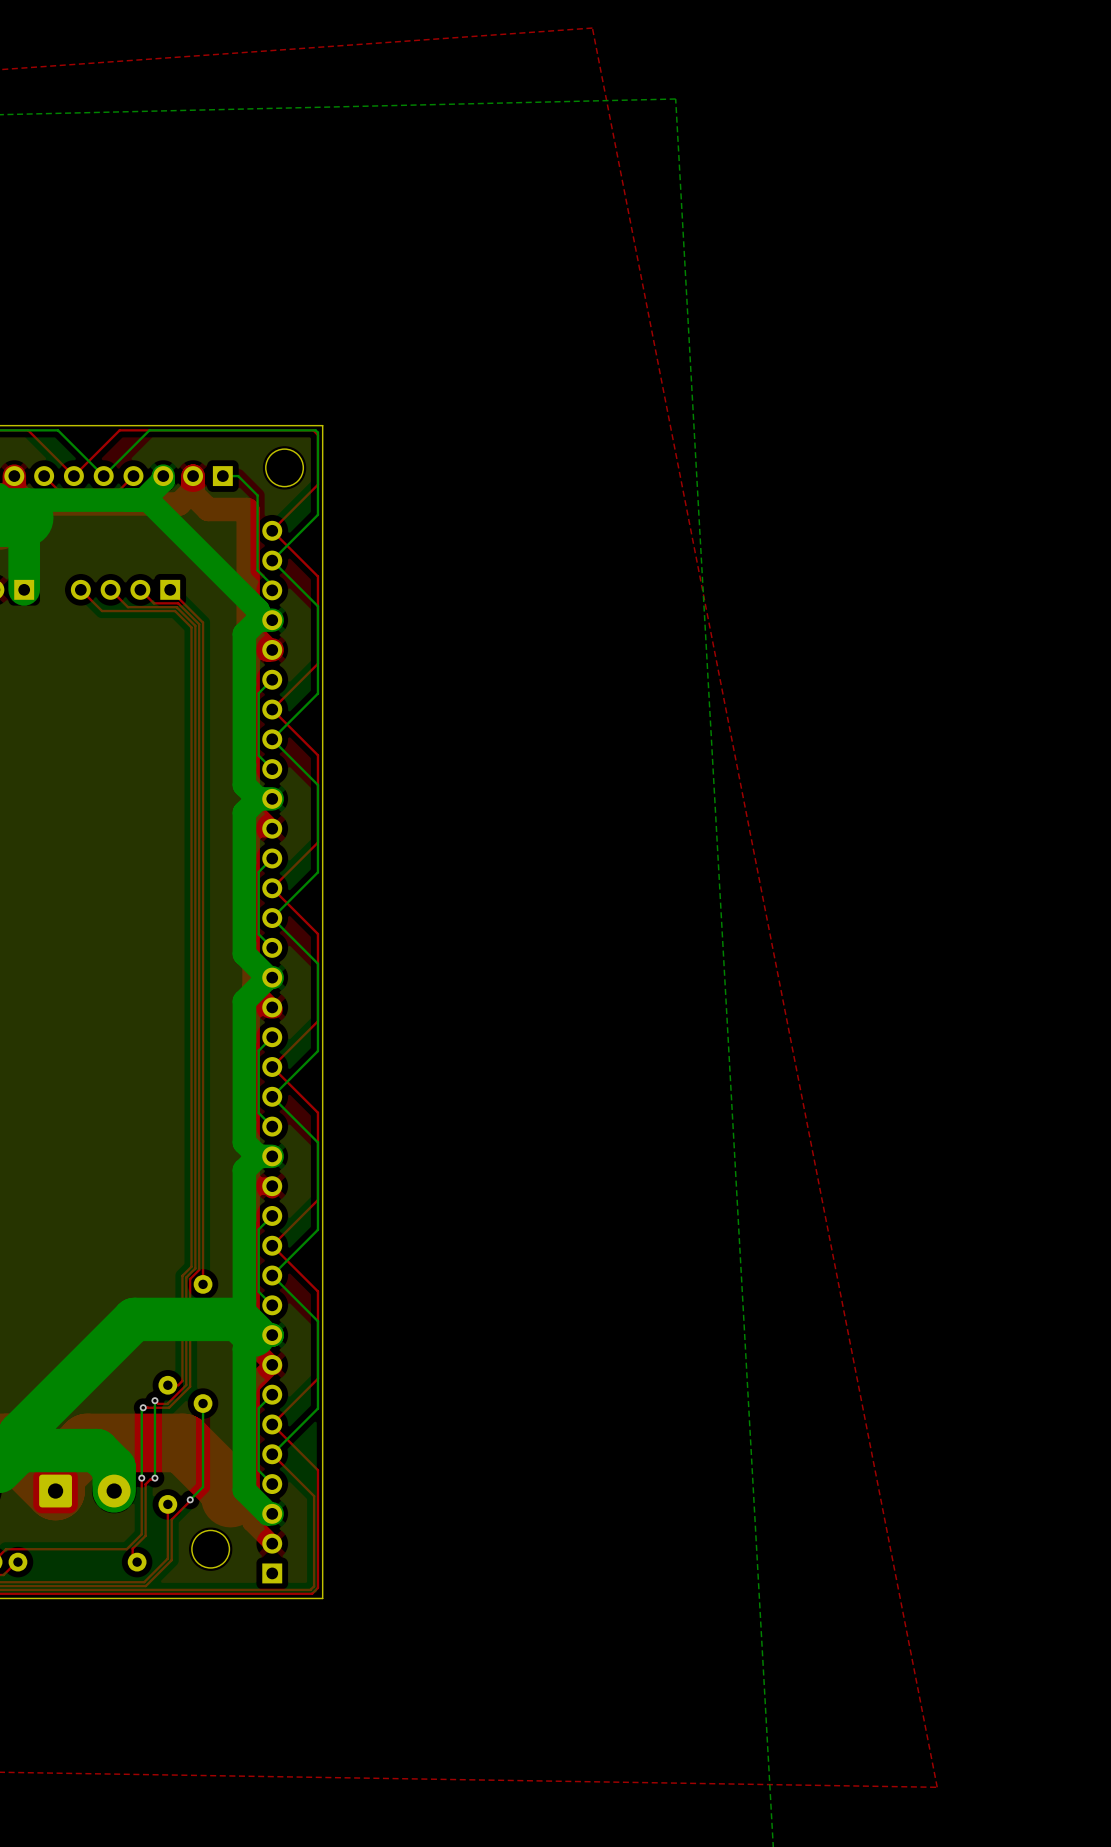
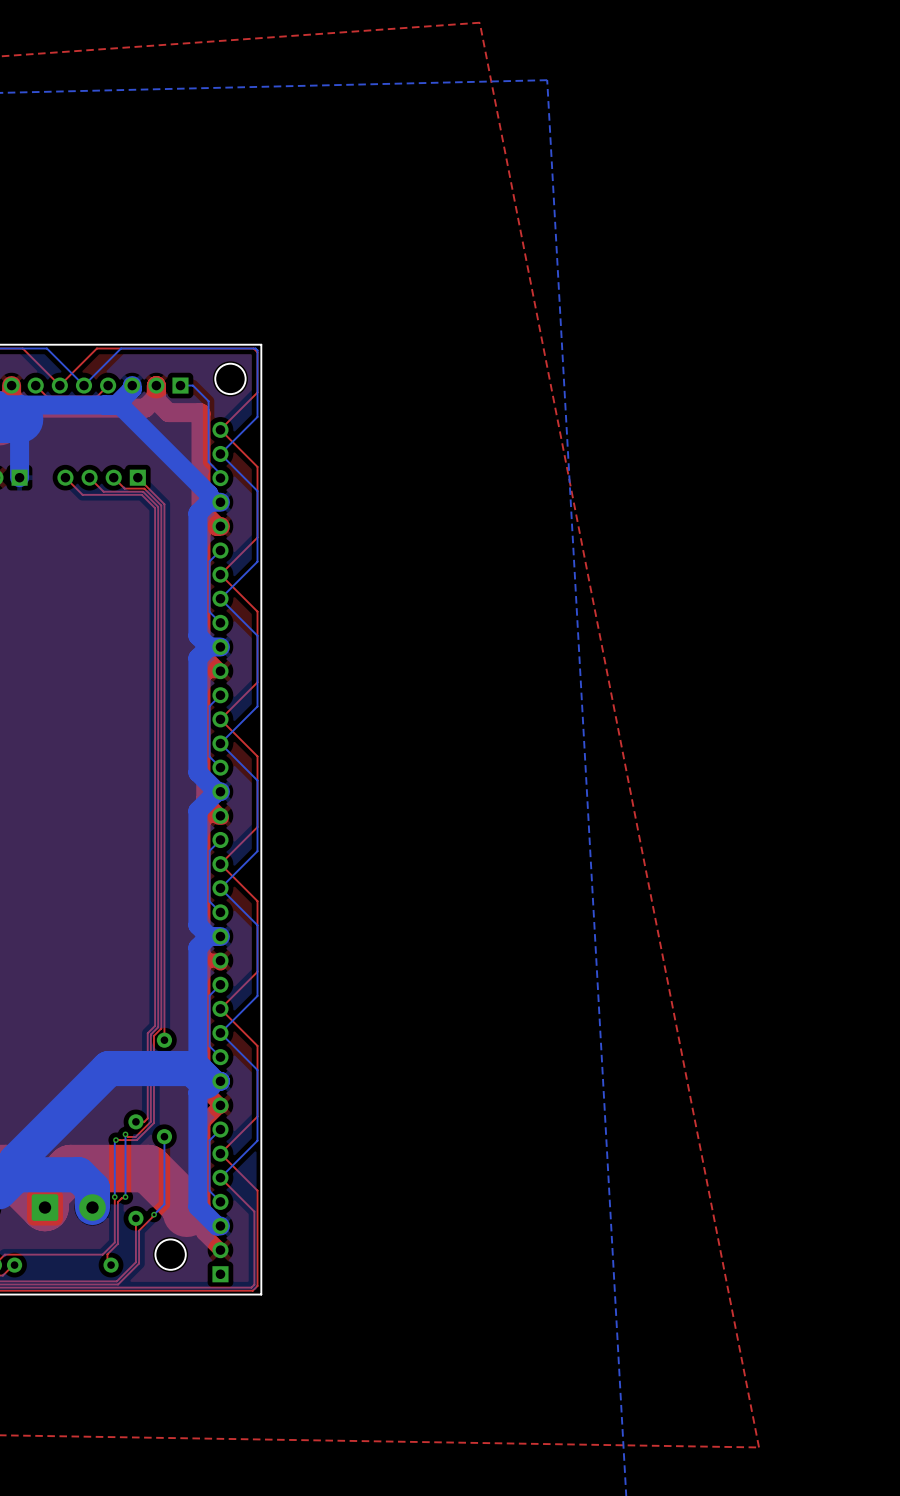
bottom track width: thick (24, 517) (24, 589) -> thin (19, 419) (19, 477)

